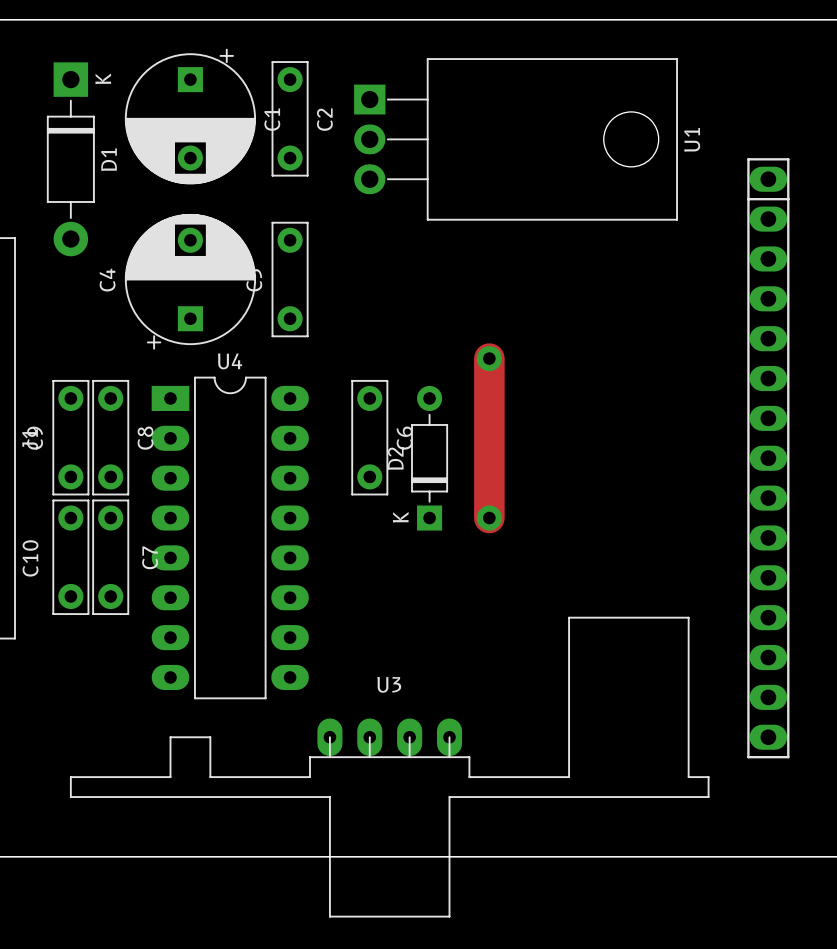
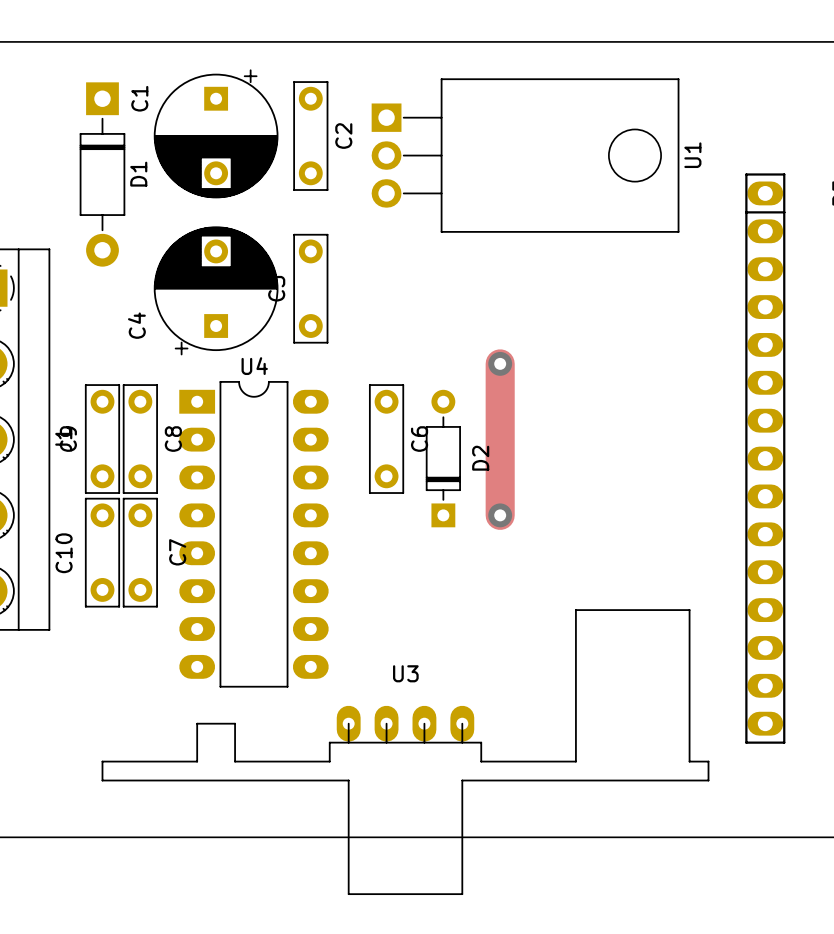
D1 text: K (103, 78) -> none
C1 name position: C1 (272, 119) -> C1 (139, 98)
C4 name position: C4 (107, 280) -> C4 (136, 325)
D2 name position: D2 (395, 458) -> D2 (480, 458)
D2 text: K (400, 517) -> none

